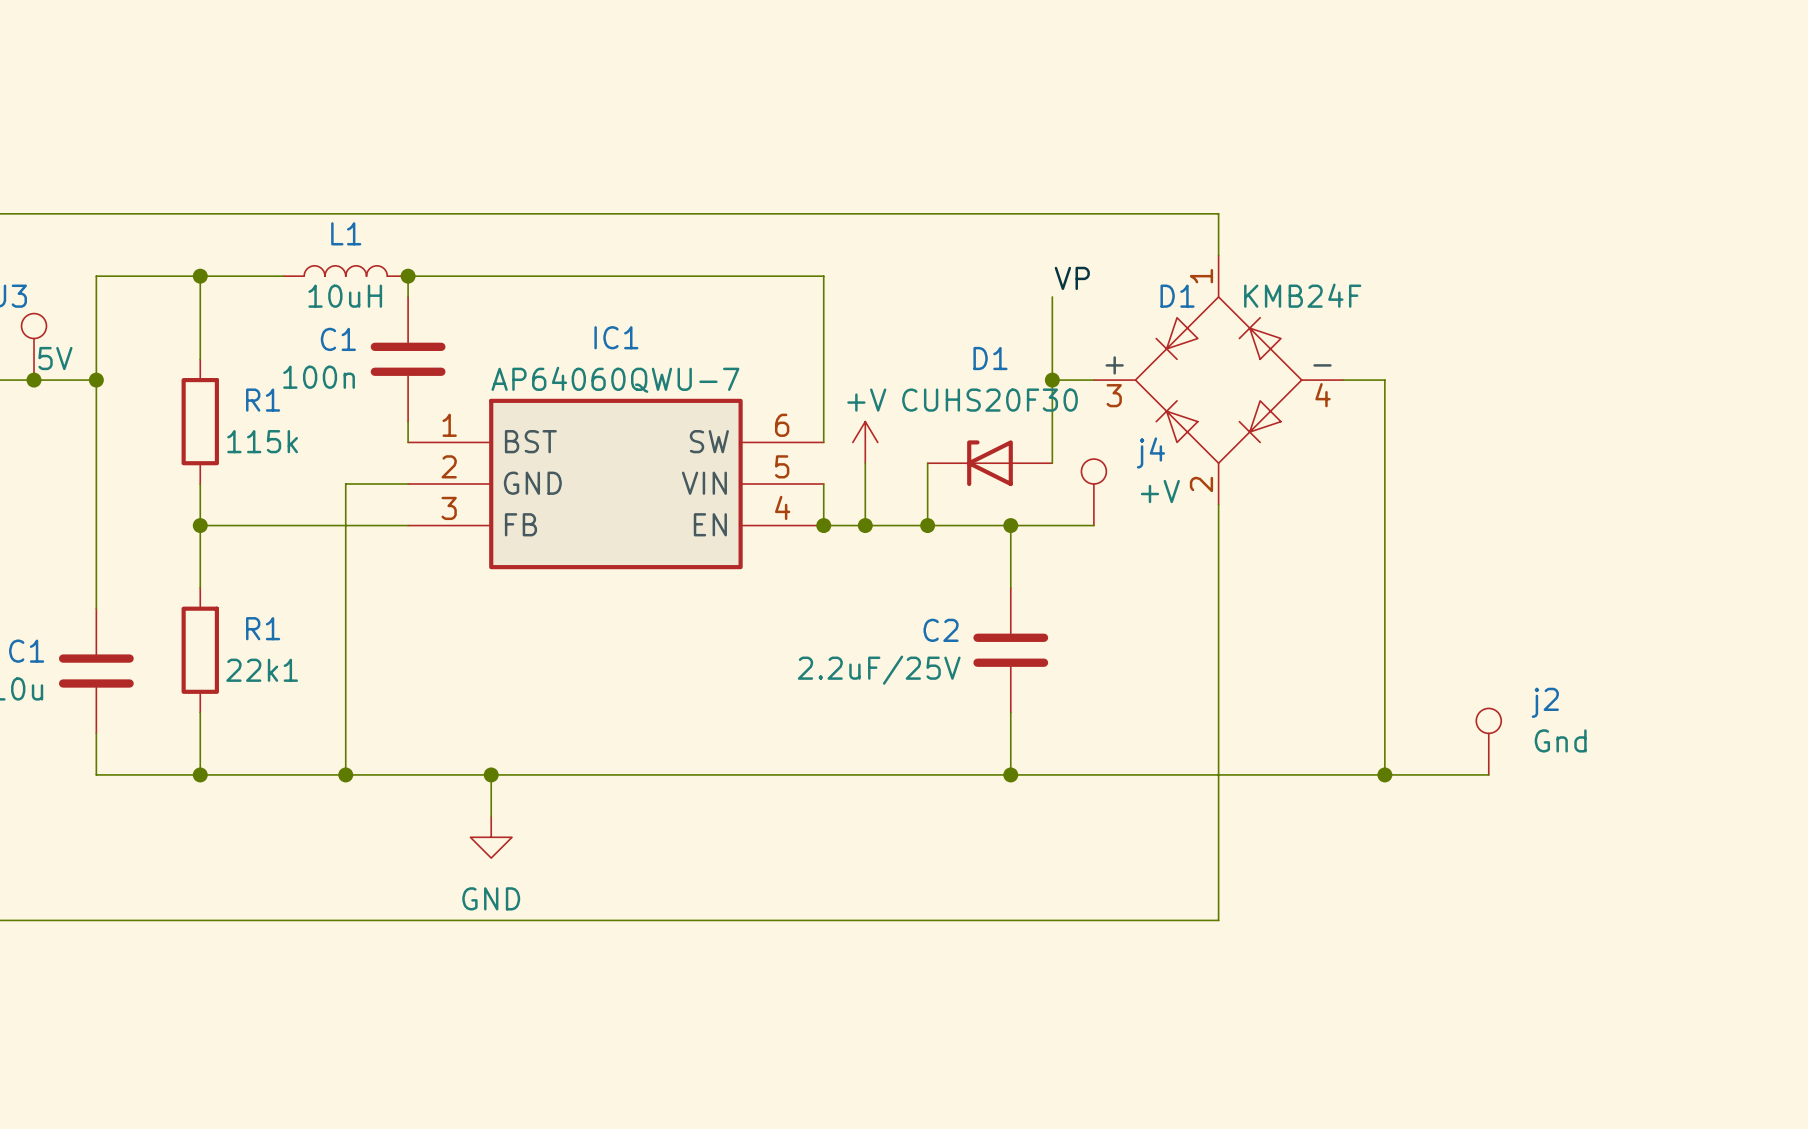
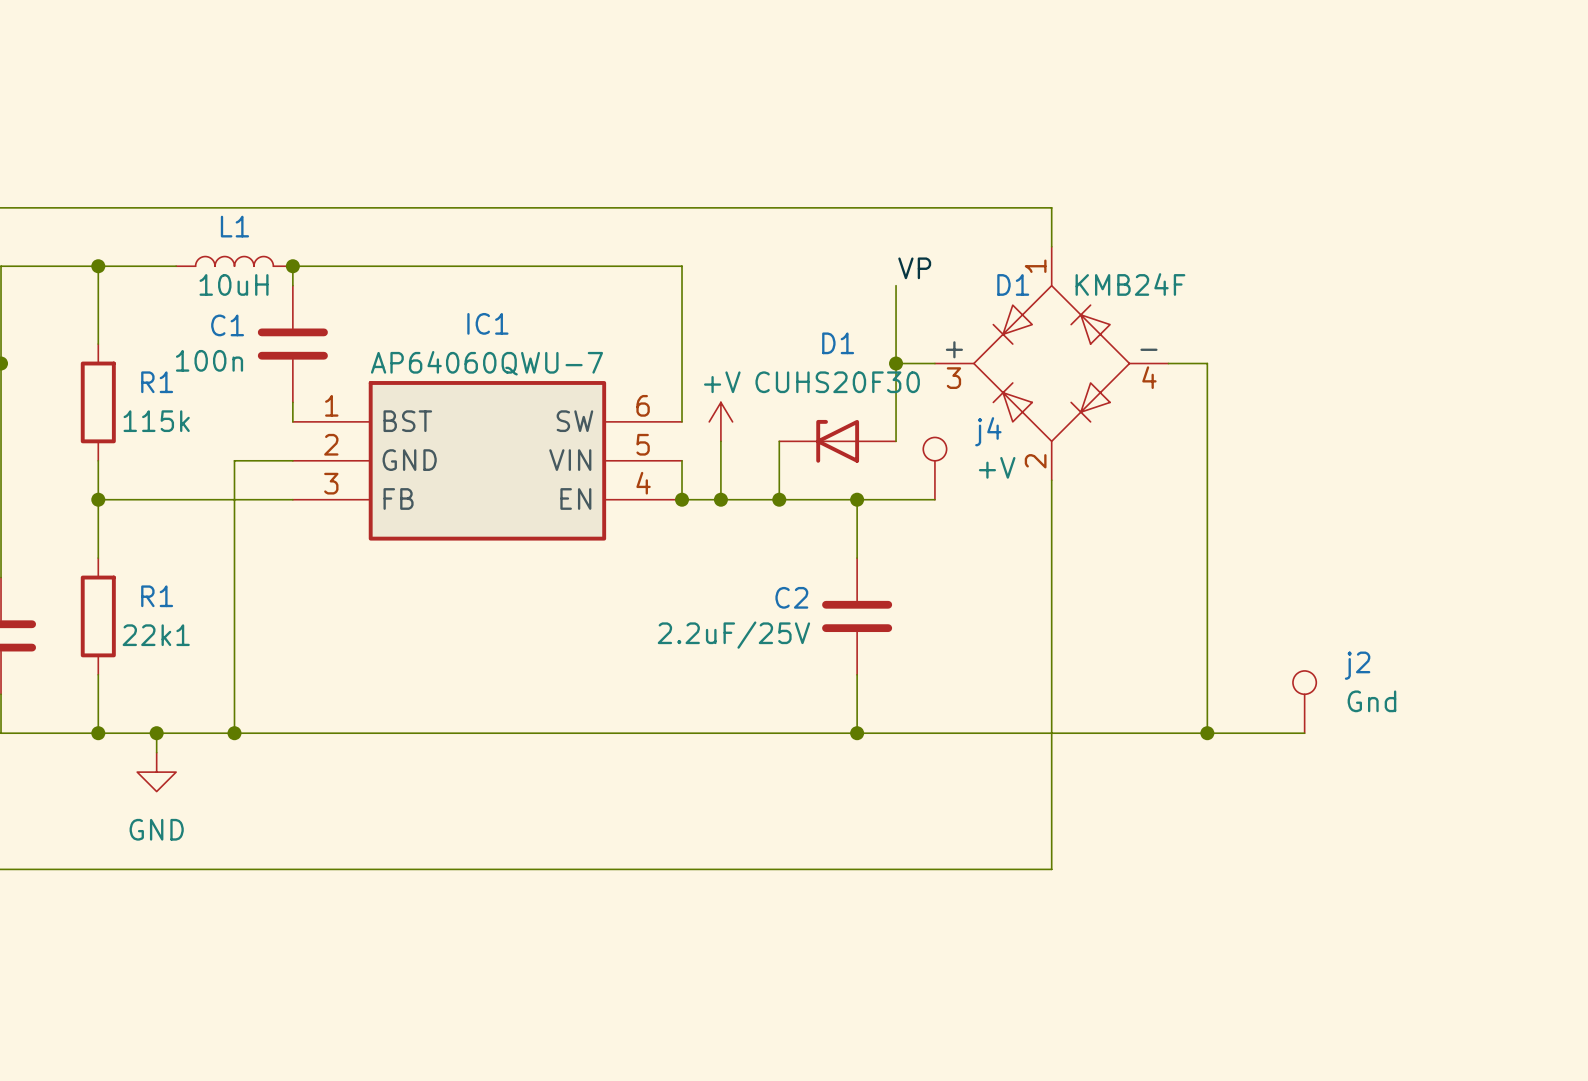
wire: none -> (156, 733) (156, 752)
junction: none -> (156, 733)
wire: (491, 774) (491, 816) -> none
junction: (491, 774) -> none
power symbol position: GND (491, 837) -> GND (156, 772)

